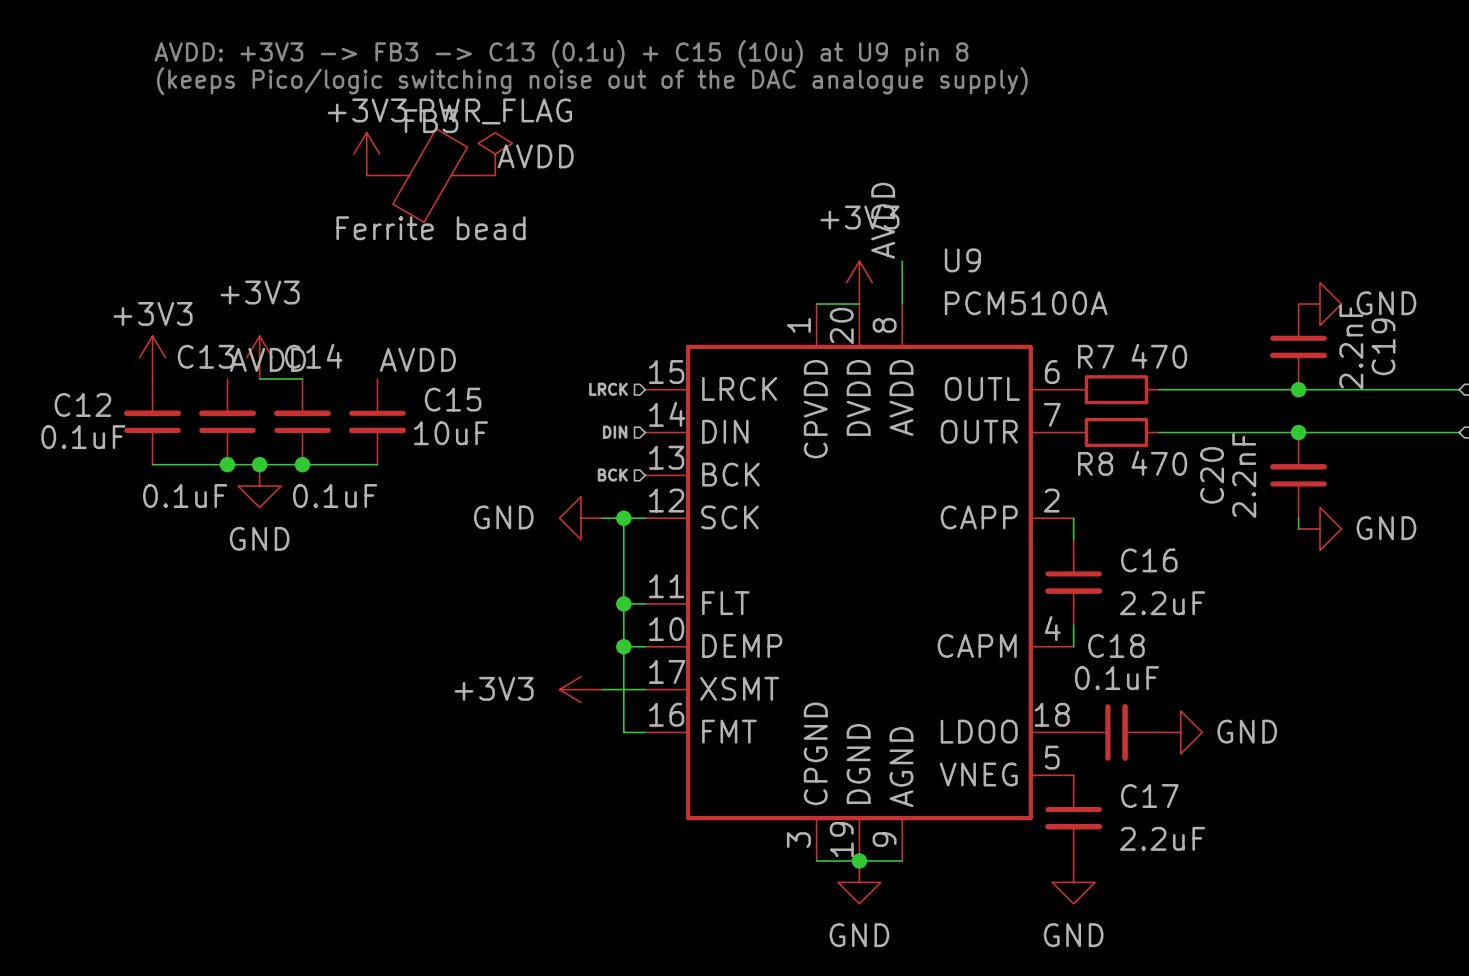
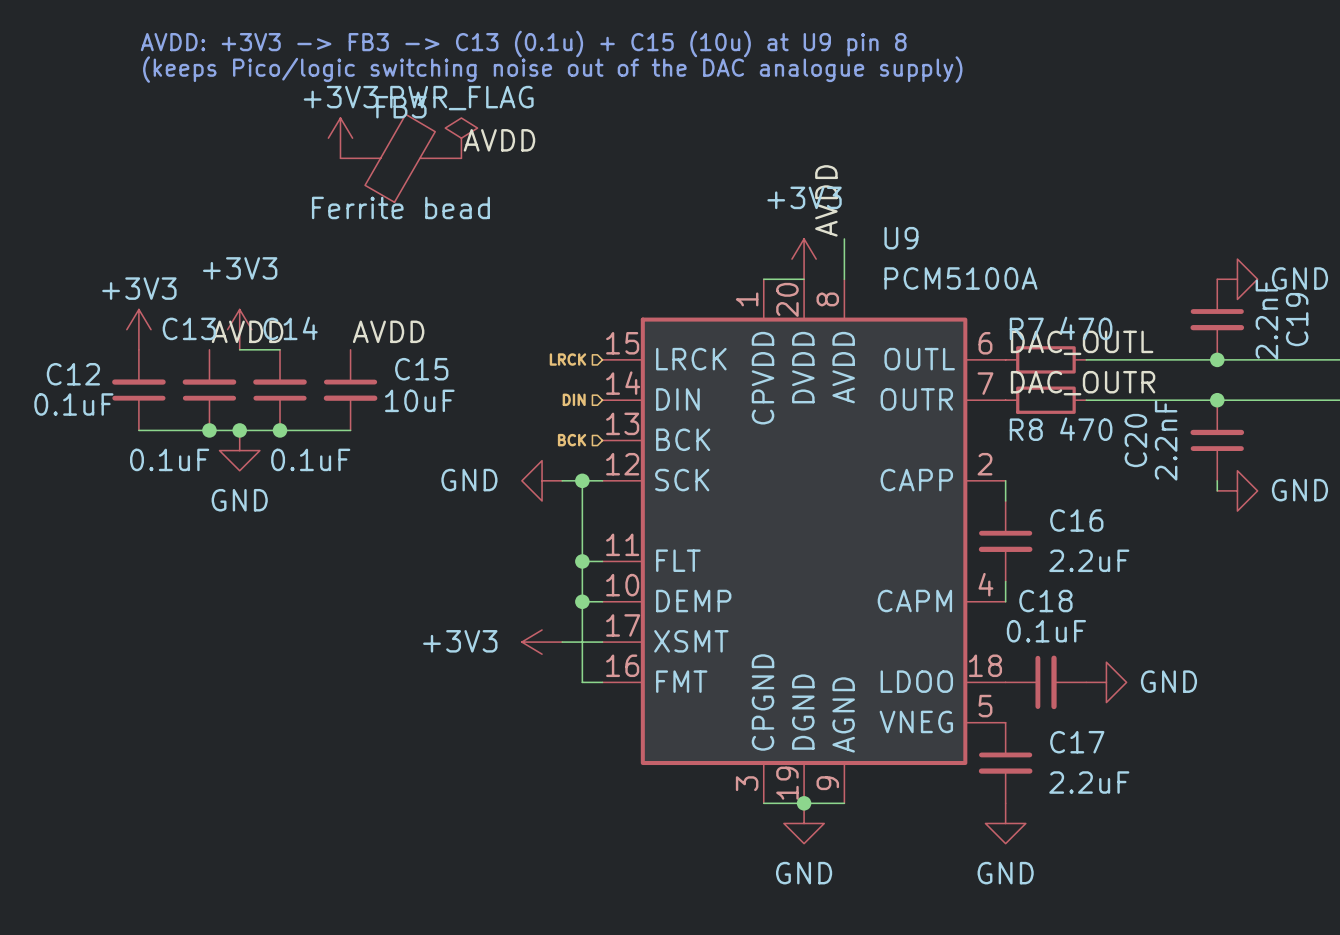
label: none -> DAC_OUTL (1082, 342)
label: none -> DAC_OUTR (1083, 383)

